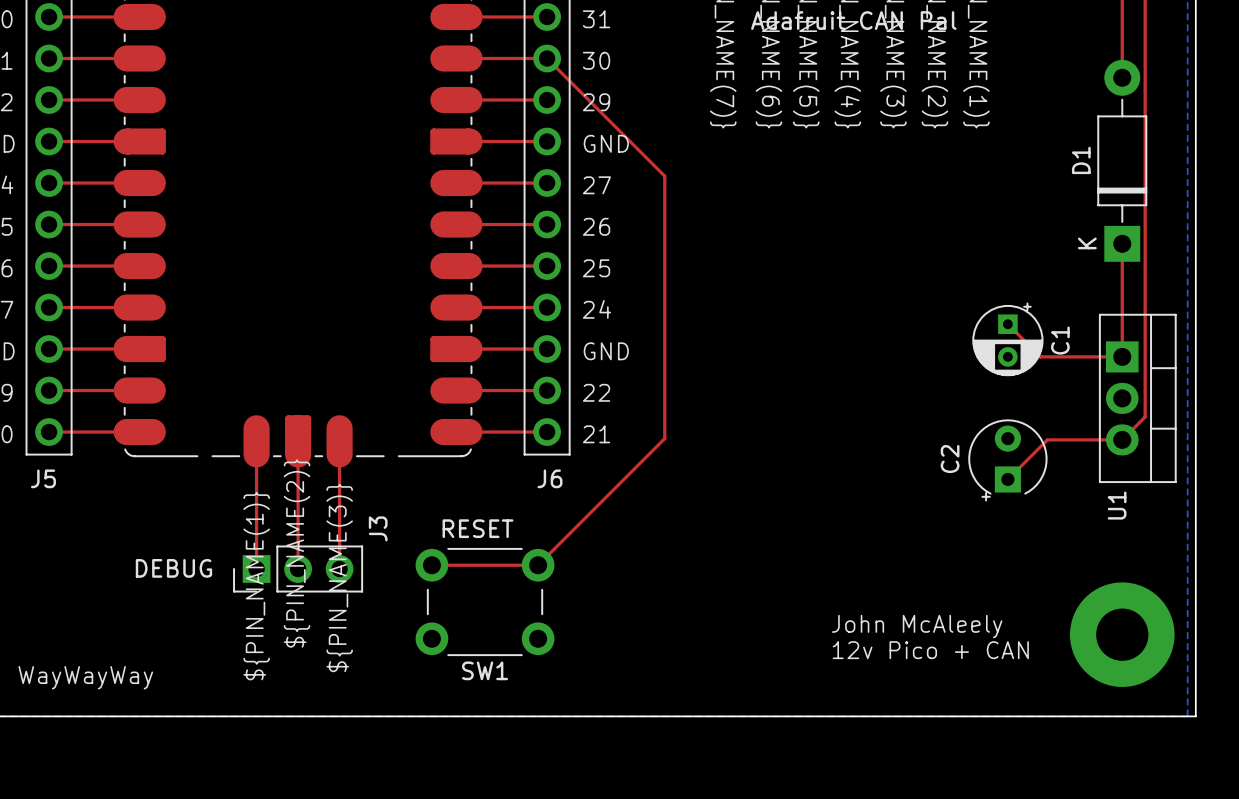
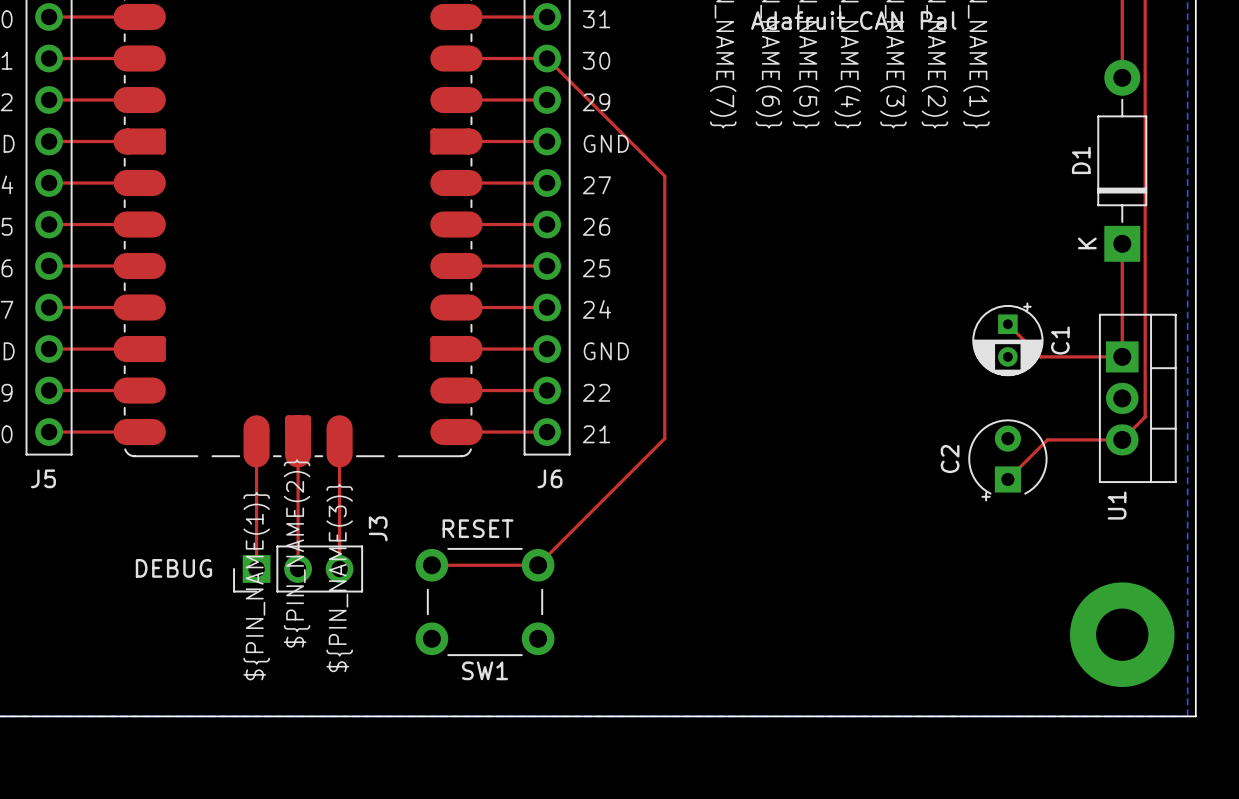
text: John McAleely (917, 626) -> none
text: 12v Pico + CAN (930, 650) -> none
text: WayWayWay (85, 677) -> none

